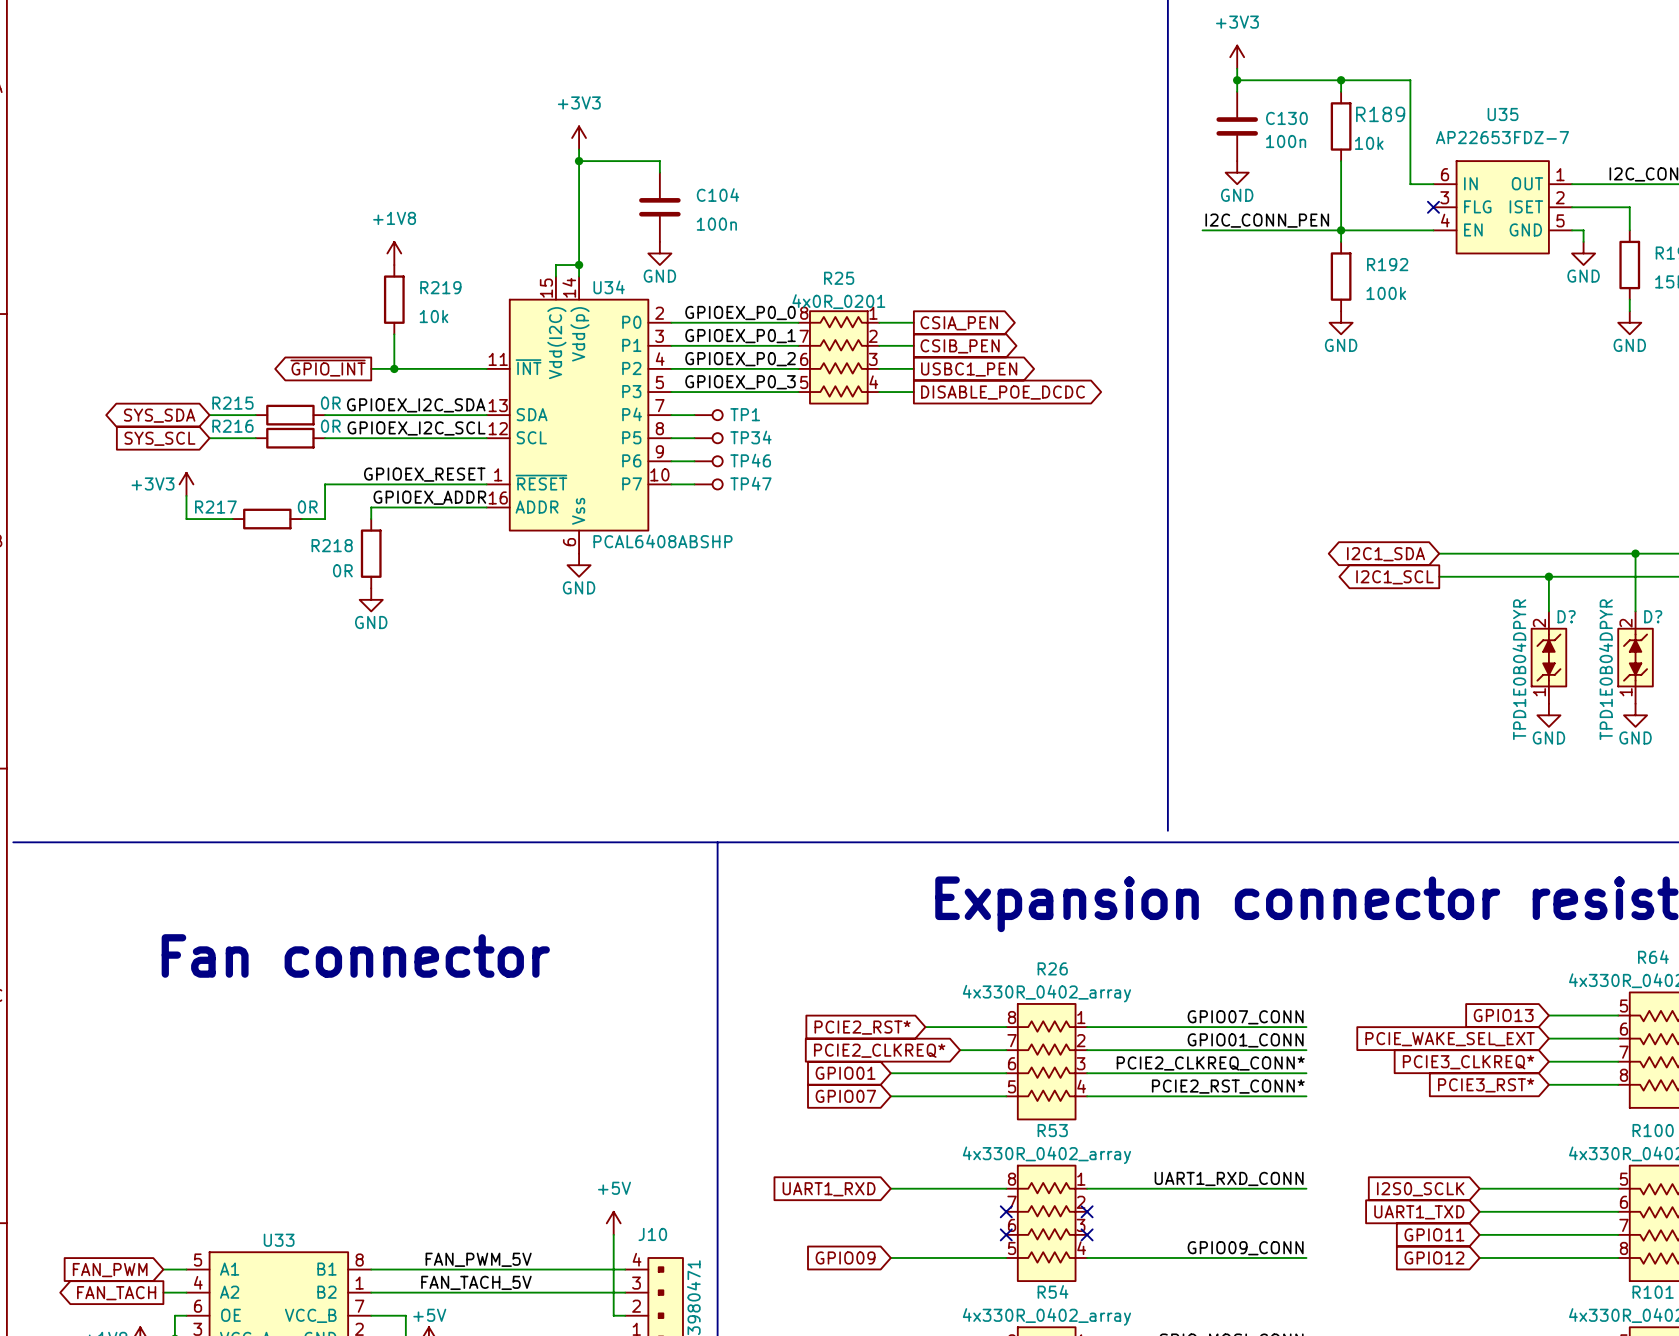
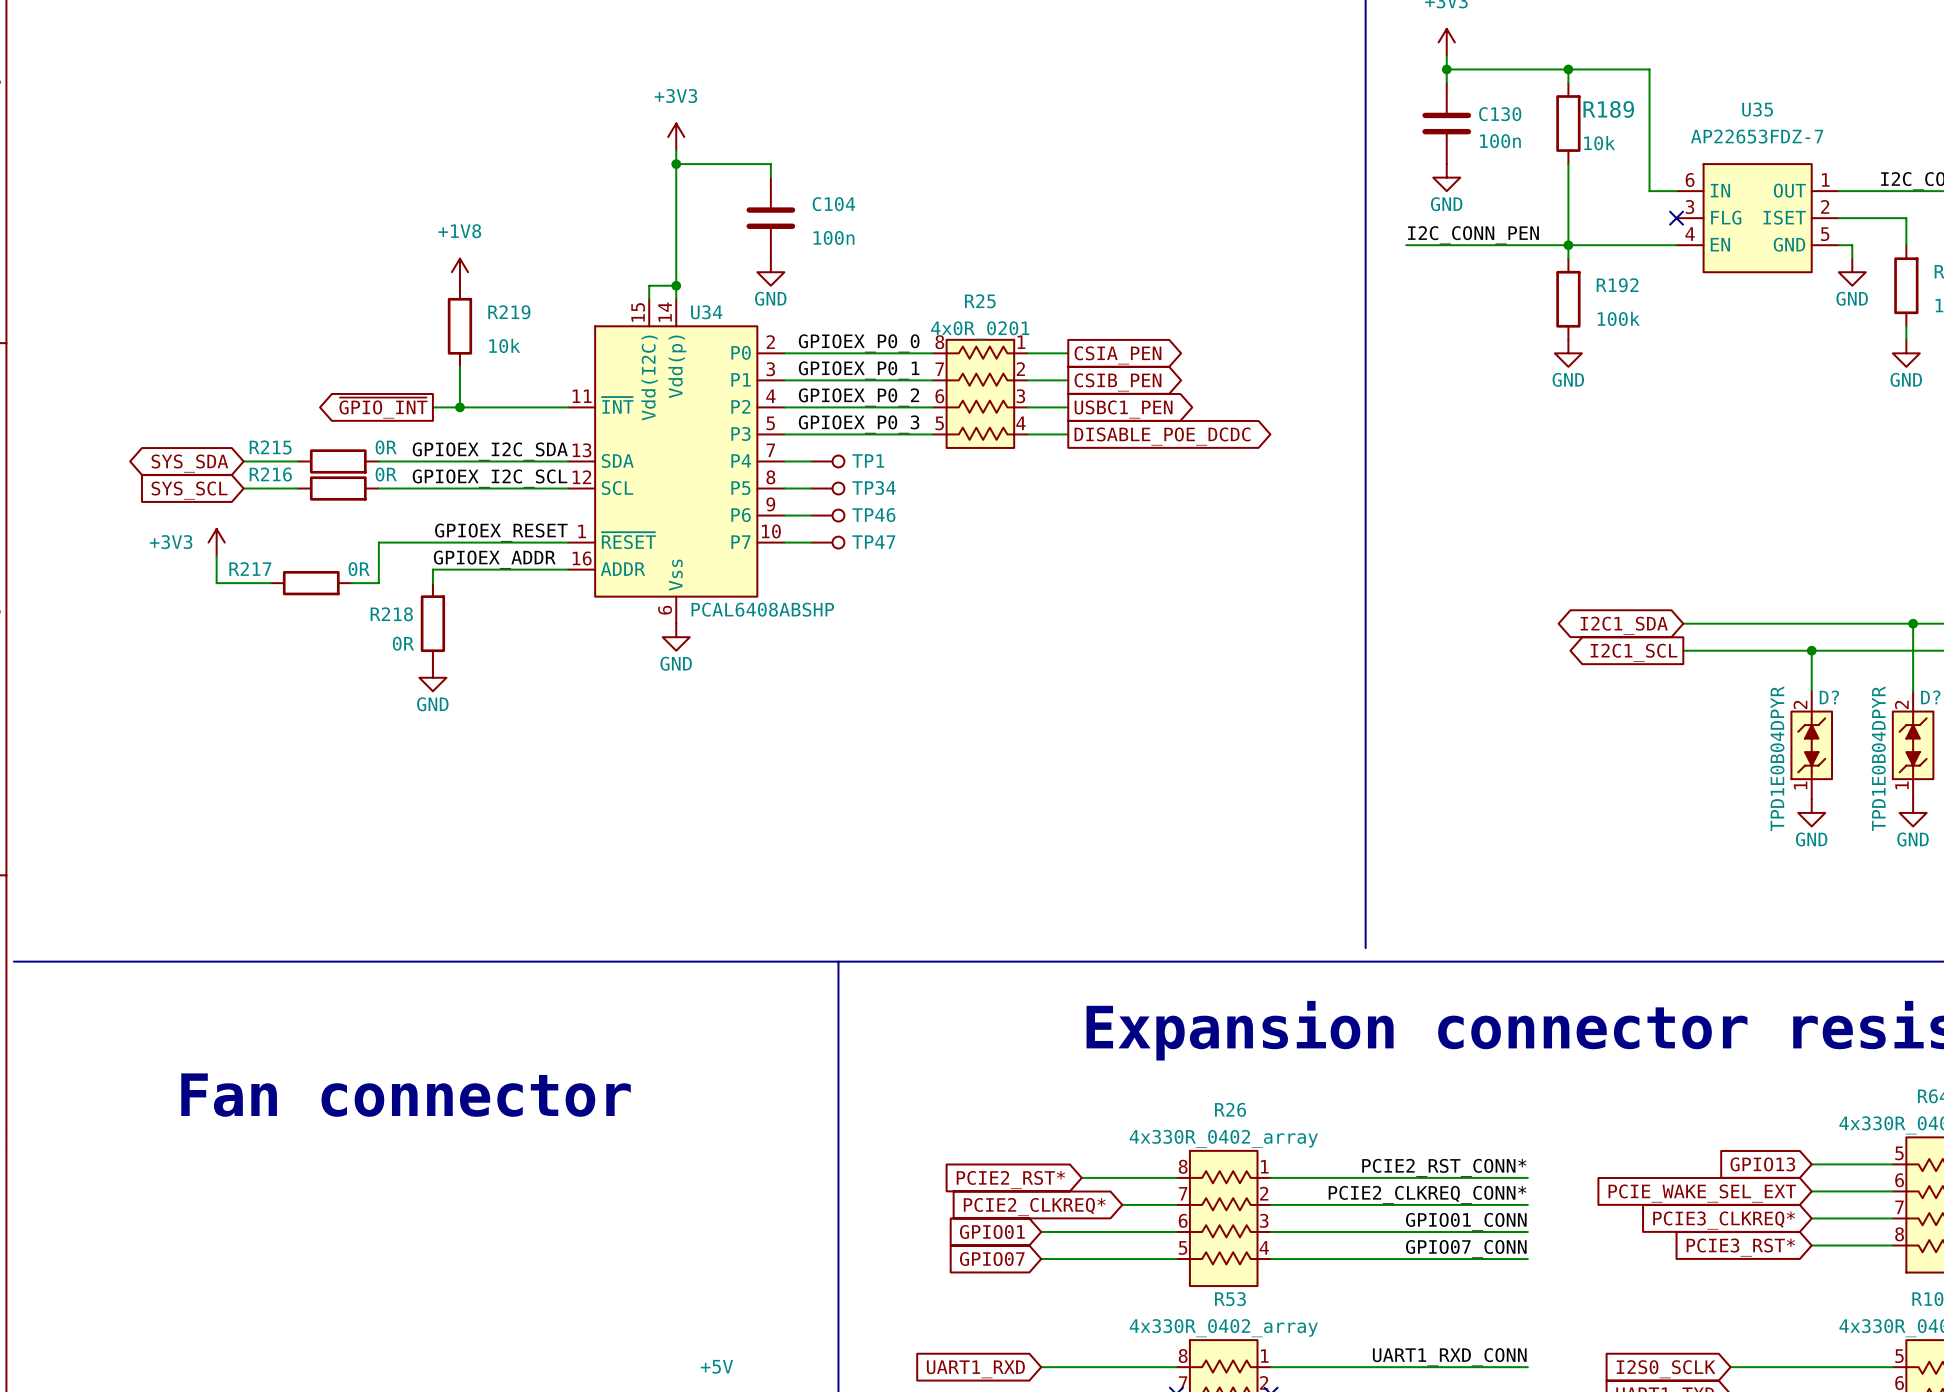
label: GPIO07_CONN (1245, 1017) -> PCIE2_RST_CONN* (1444, 1167)
label: GPIO01_CONN (1245, 1040) -> PCIE2_CLKREQ_CONN* (1427, 1194)
label: PCIE2_CLKREQ_CONN* (1210, 1063) -> GPIO01_CONN (1466, 1221)
label: PCIE2_RST_CONN* (1228, 1086) -> GPIO07_CONN (1466, 1249)

